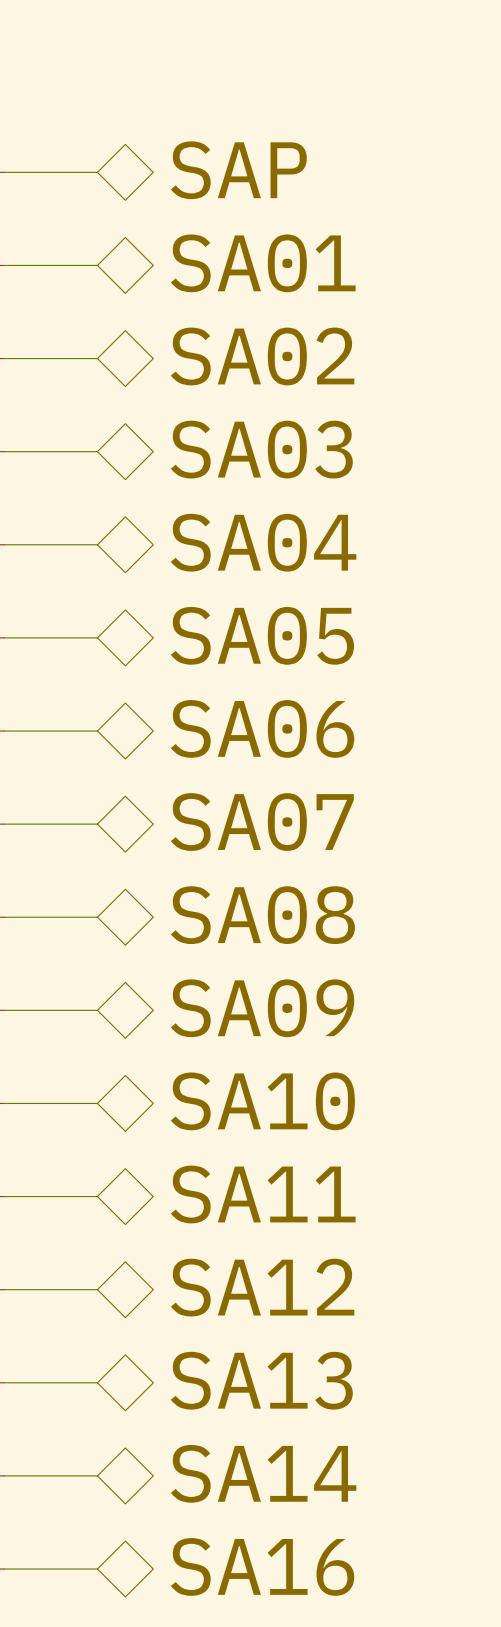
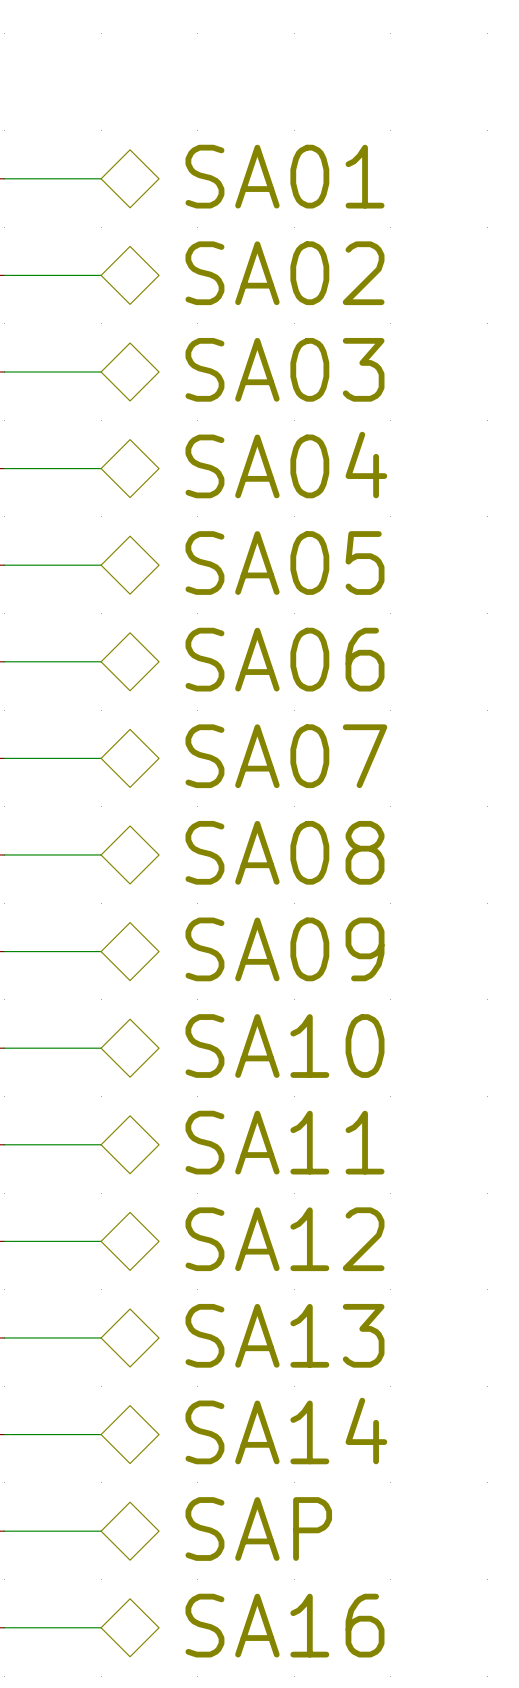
hierarchical label: SAP (238, 170) -> SA01 (284, 176)
hierarchical label: SA01 (263, 263) -> SA02 (284, 273)
hierarchical label: SA02 (262, 356) -> SA03 (284, 369)
hierarchical label: SA03 (261, 449) -> SA04 (286, 465)
hierarchical label: SA04 (263, 542) -> SA05 (284, 563)
hierarchical label: SA05 (262, 635) -> SA06 (284, 659)
hierarchical label: SA06 (262, 728) -> SA07 (286, 756)
hierarchical label: SA07 (262, 822) -> SA08 (284, 852)
hierarchical label: SA08 (262, 915) -> SA09 (284, 949)
hierarchical label: SA09 (262, 1008) -> SA10 (284, 1046)
hierarchical label: SA10 (262, 1101) -> SA11 (284, 1142)
hierarchical label: SA11 (263, 1194) -> SA12 (284, 1239)
hierarchical label: SA12 (262, 1287) -> SA13 (284, 1335)
hierarchical label: SA13 (261, 1380) -> SA14 (286, 1431)
hierarchical label: SA14 (263, 1473) -> SAP (258, 1529)

